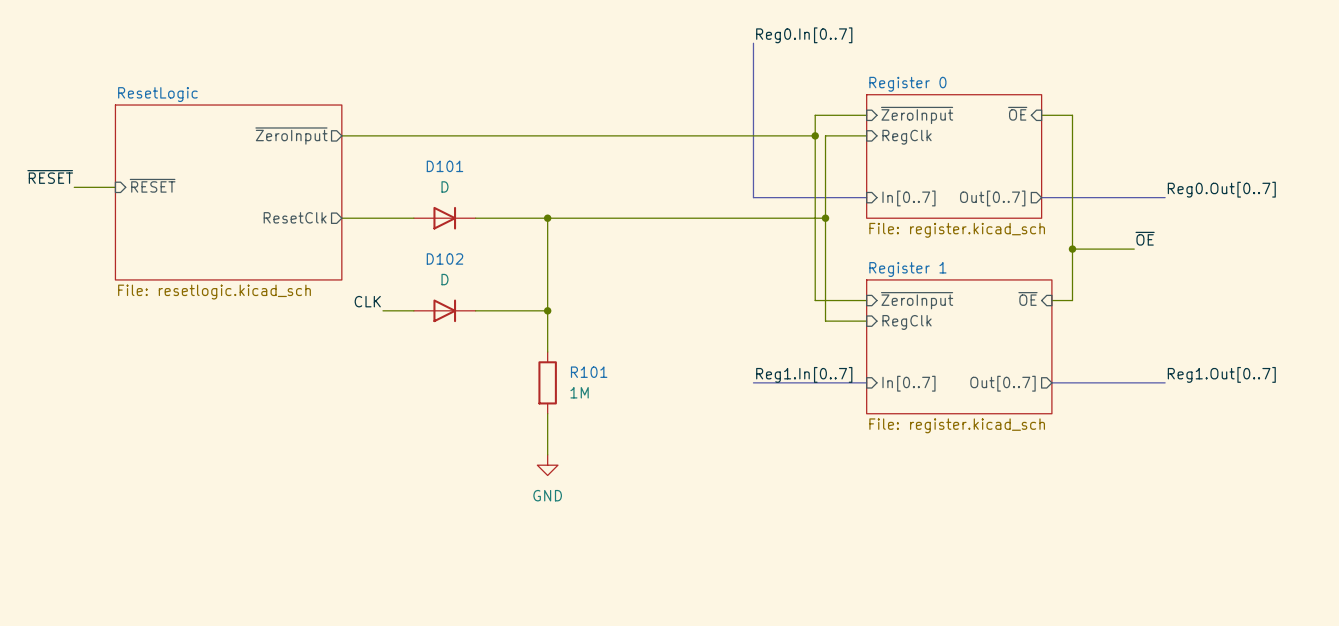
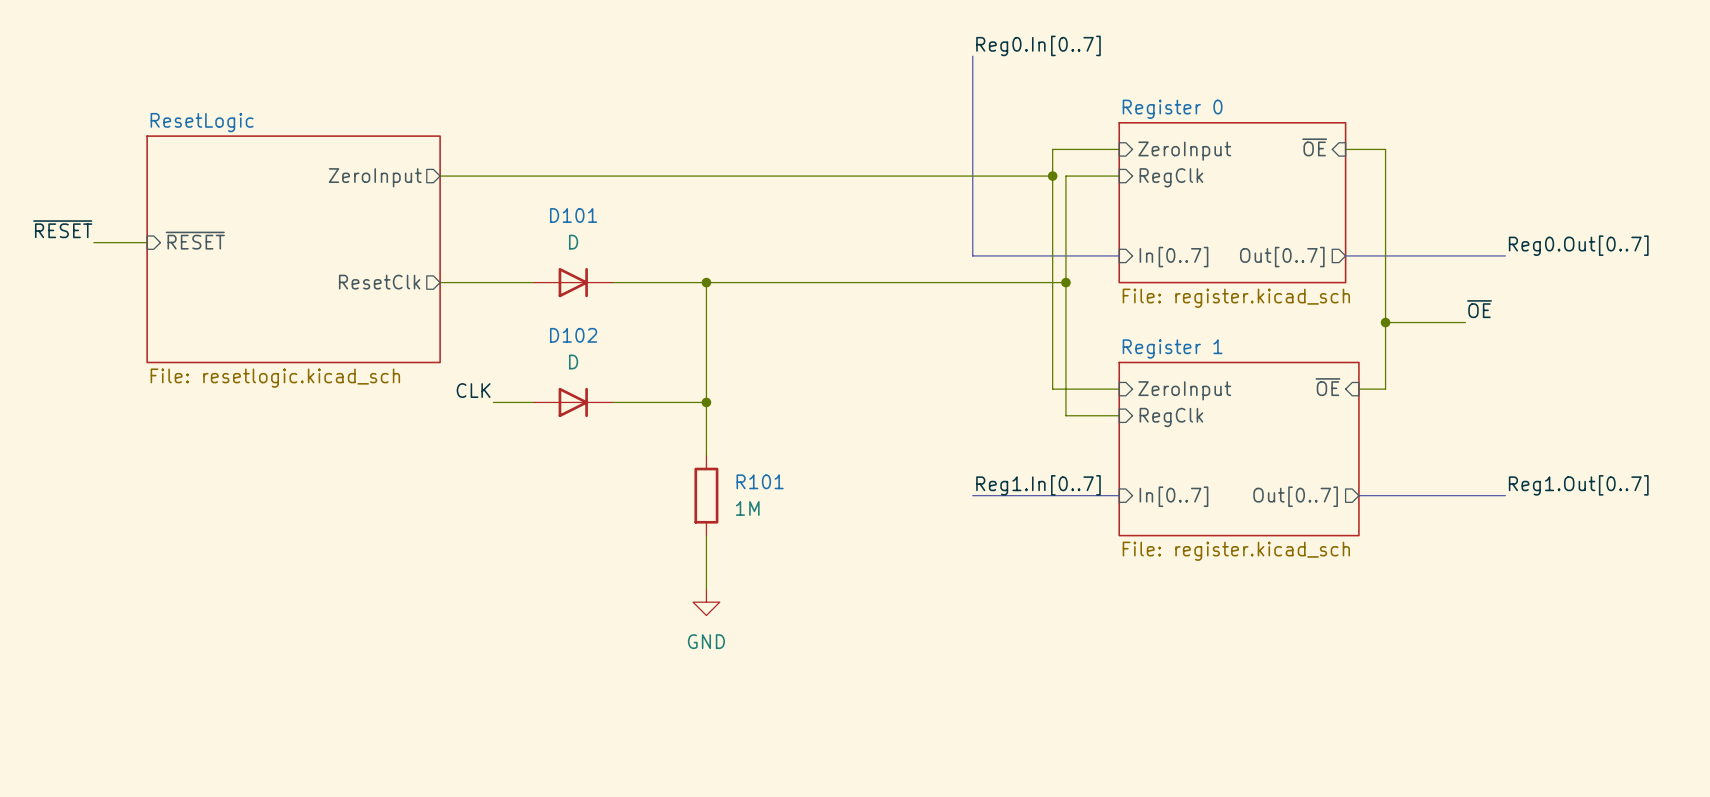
sheet pin: ~{ZeroInput} (917, 115) -> ZeroInput (1184, 151)
sheet pin: ~{ZeroInput} (291, 136) -> ZeroInput (375, 177)
sheet pin: ~{ZeroInput} (917, 300) -> ZeroInput (1184, 390)

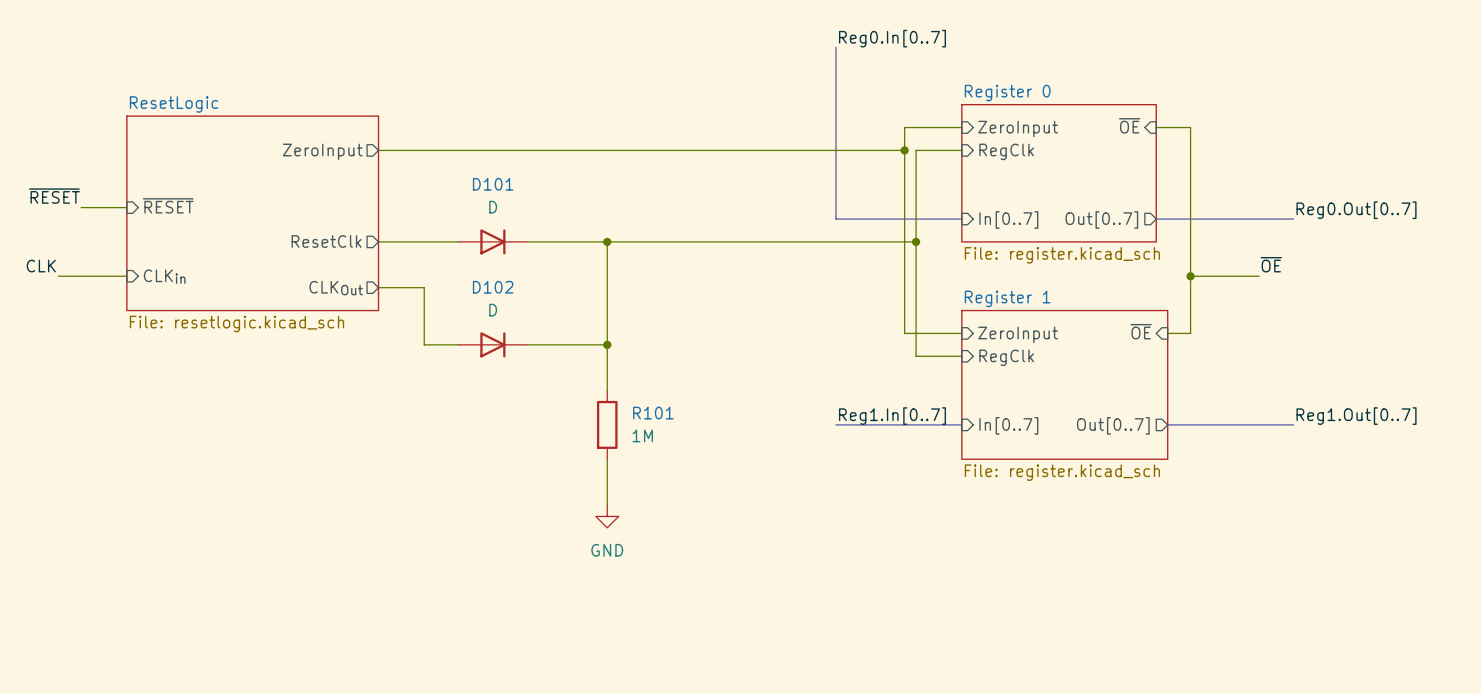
label: none -> CLK (41, 266)
wire: none -> (58, 276) (126, 276)
sheet pin: none -> CLKin (164, 276)
wire: none -> (378, 287) (424, 287) (424, 344)
sheet pin: none -> CLKOut (336, 288)
label: CLK (473, 390) -> none

